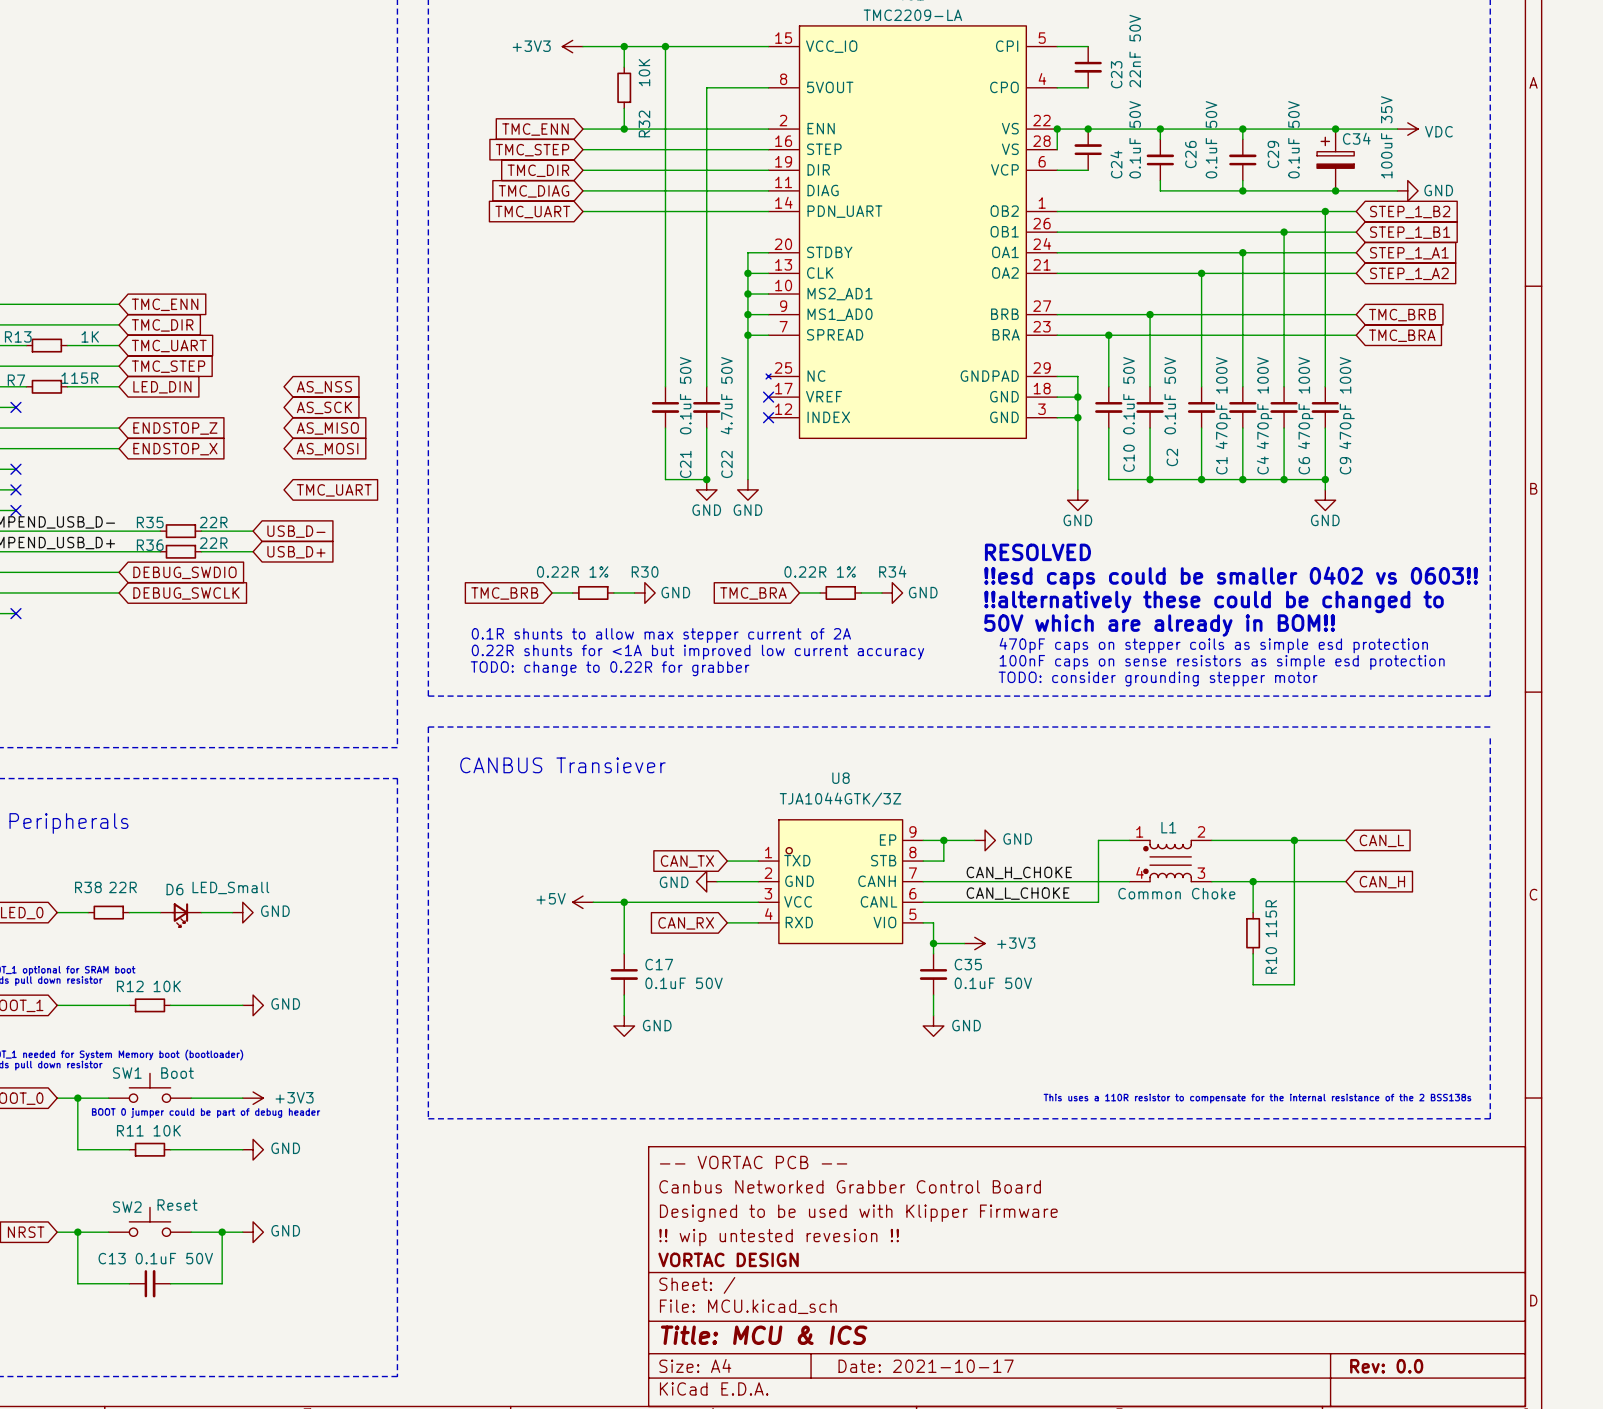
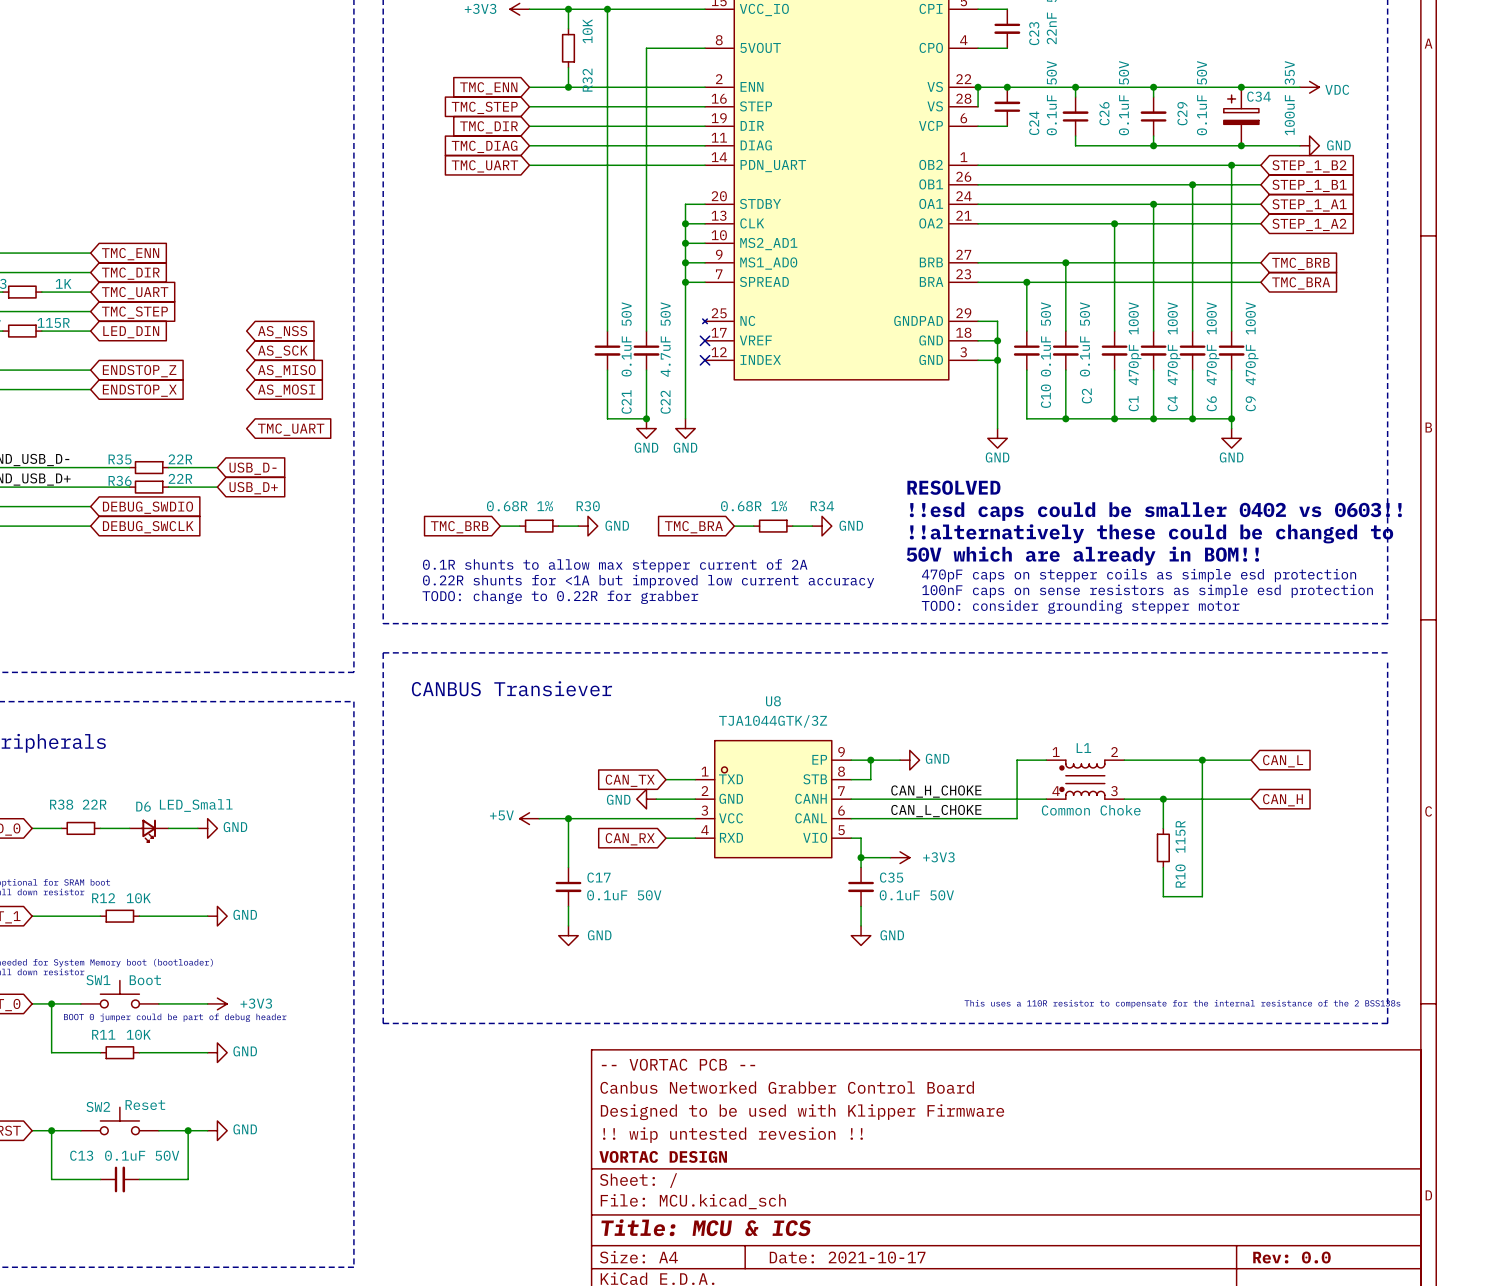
R30 value: 0.22R 1% (572, 571) -> 0.68R 1% (519, 506)
R34 value: 0.22R 1% (820, 571) -> 0.68R 1% (754, 506)

